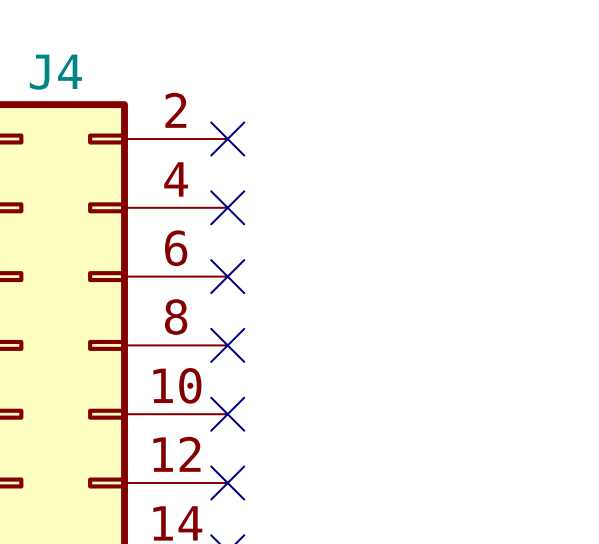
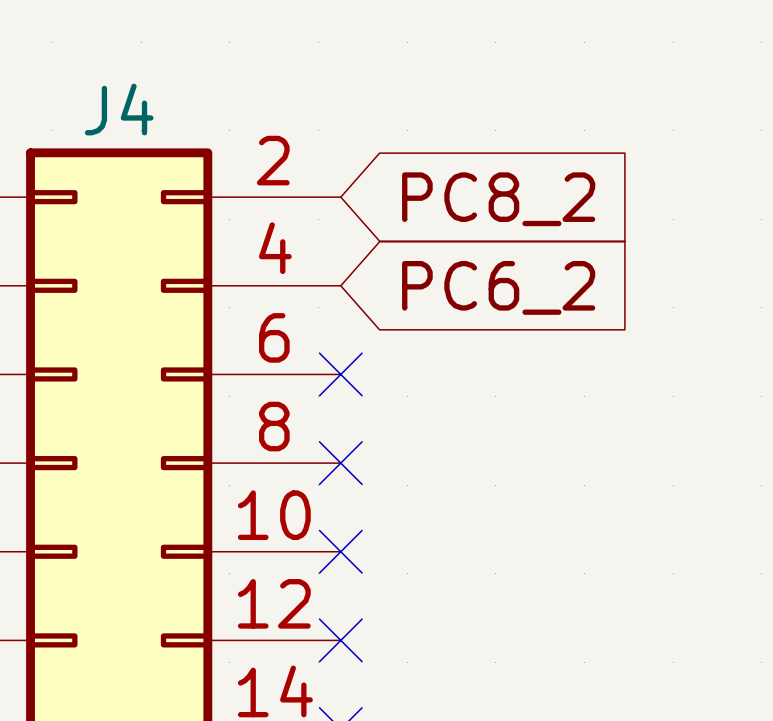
no-connect mark: (227, 139) -> none
global label: none -> PC8_2 (498, 199)
no-connect mark: (227, 207) -> none
global label: none -> PC6_2 (498, 287)

